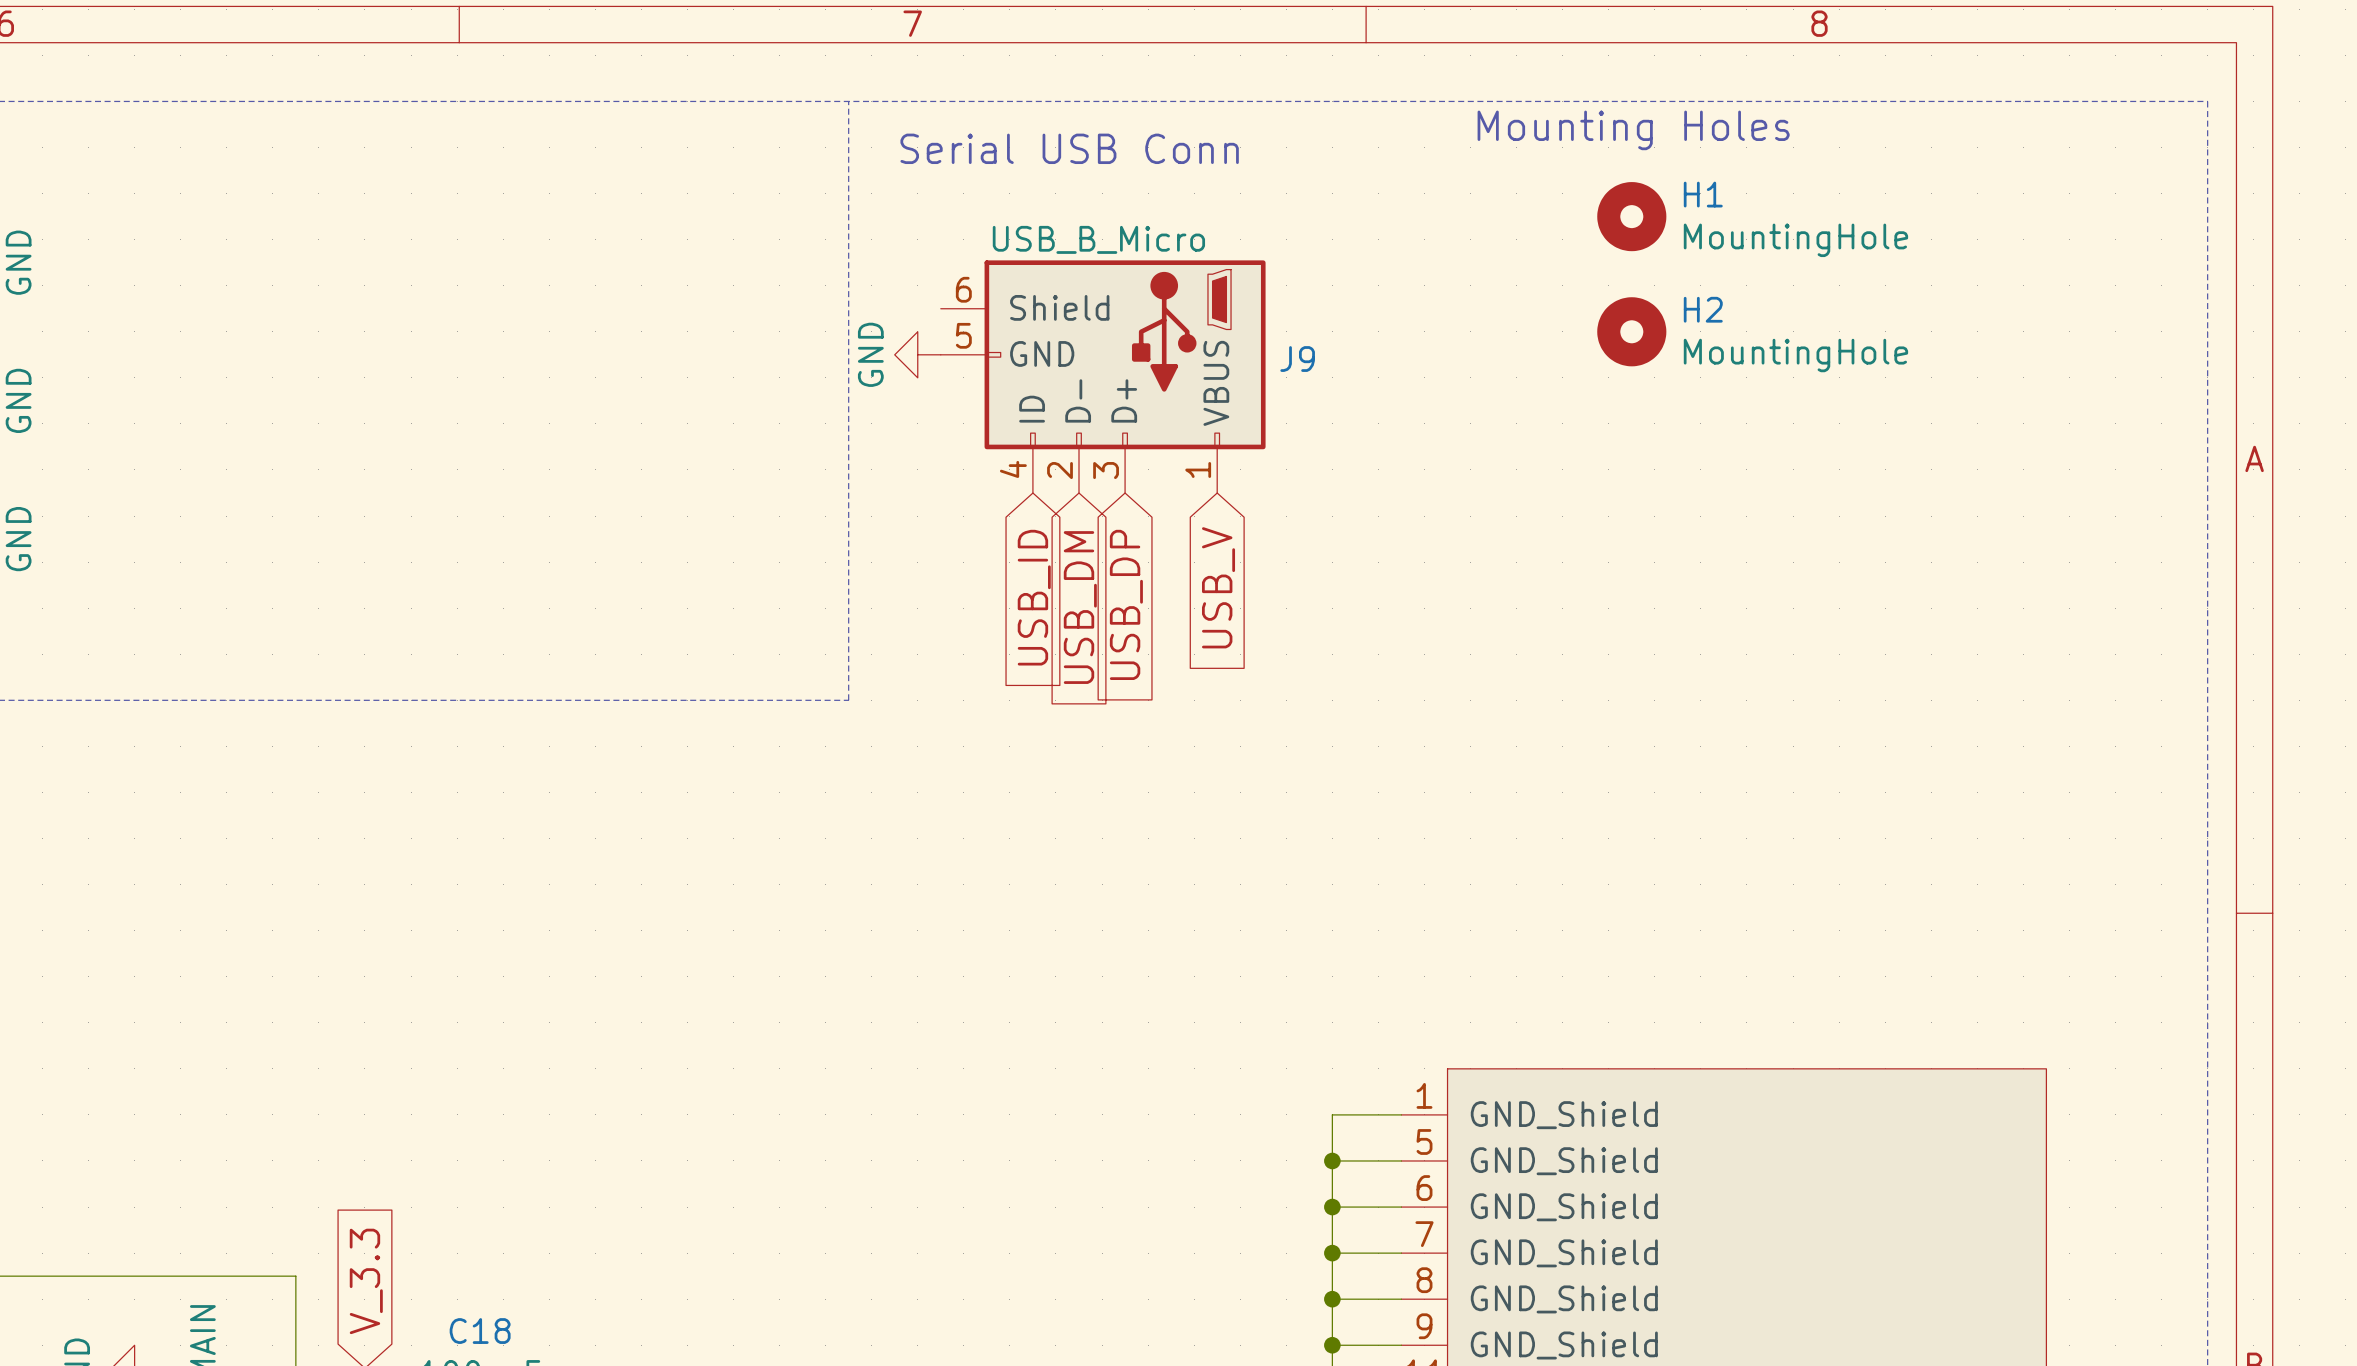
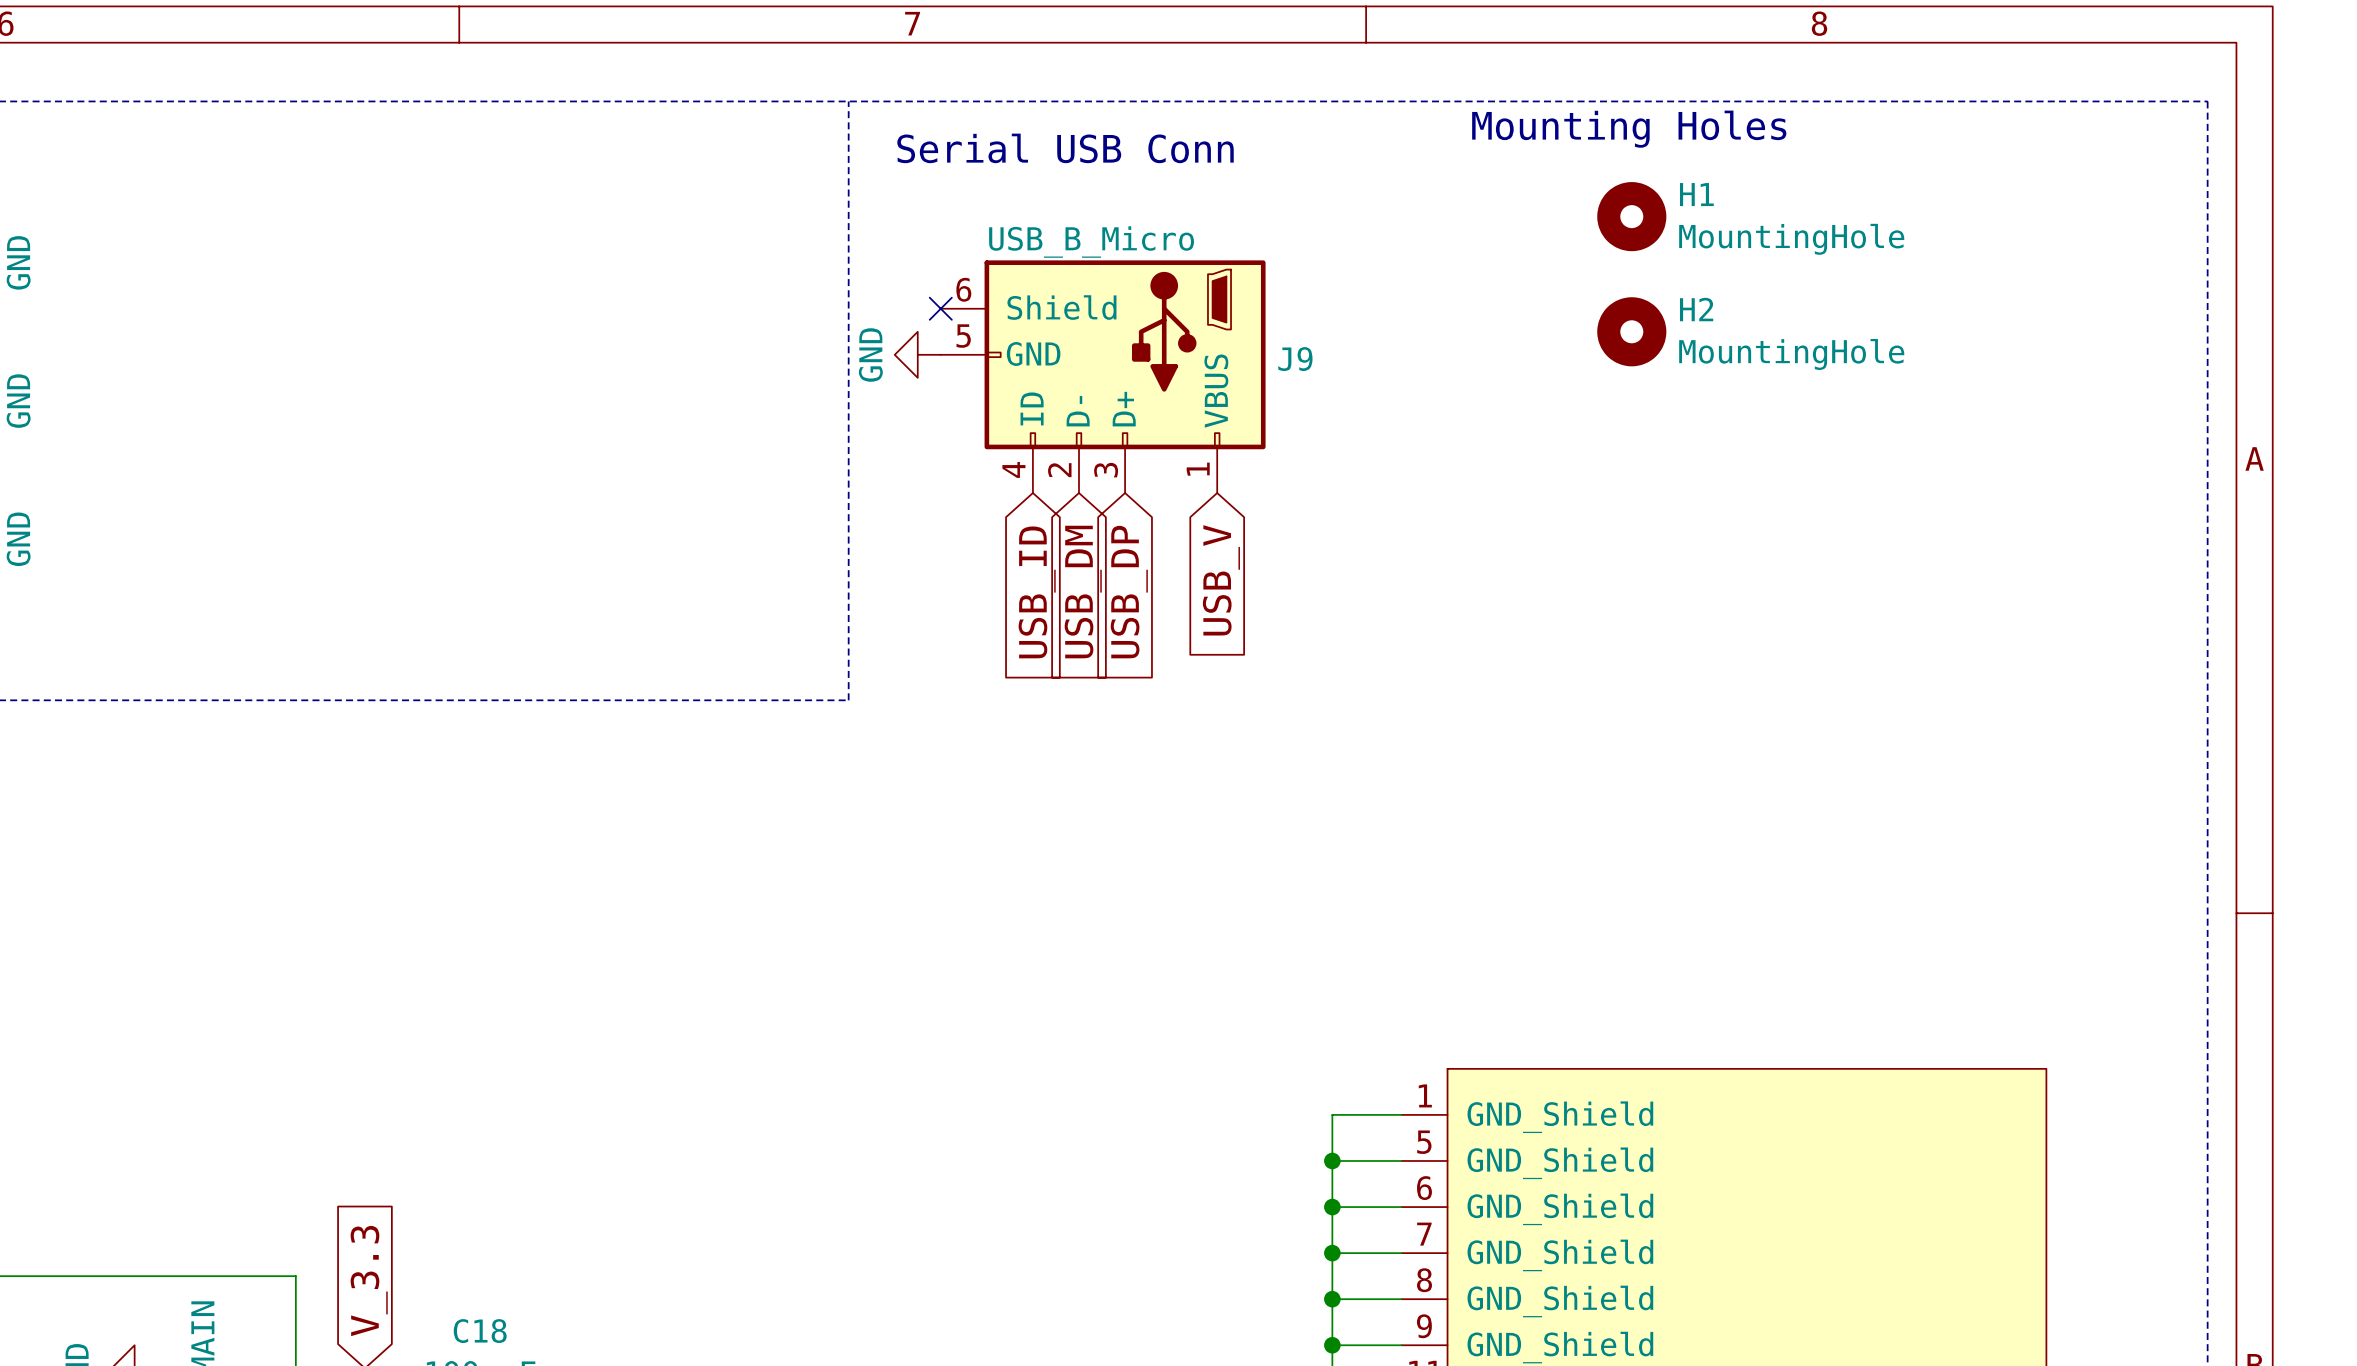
no-connect mark: none -> (940, 308)

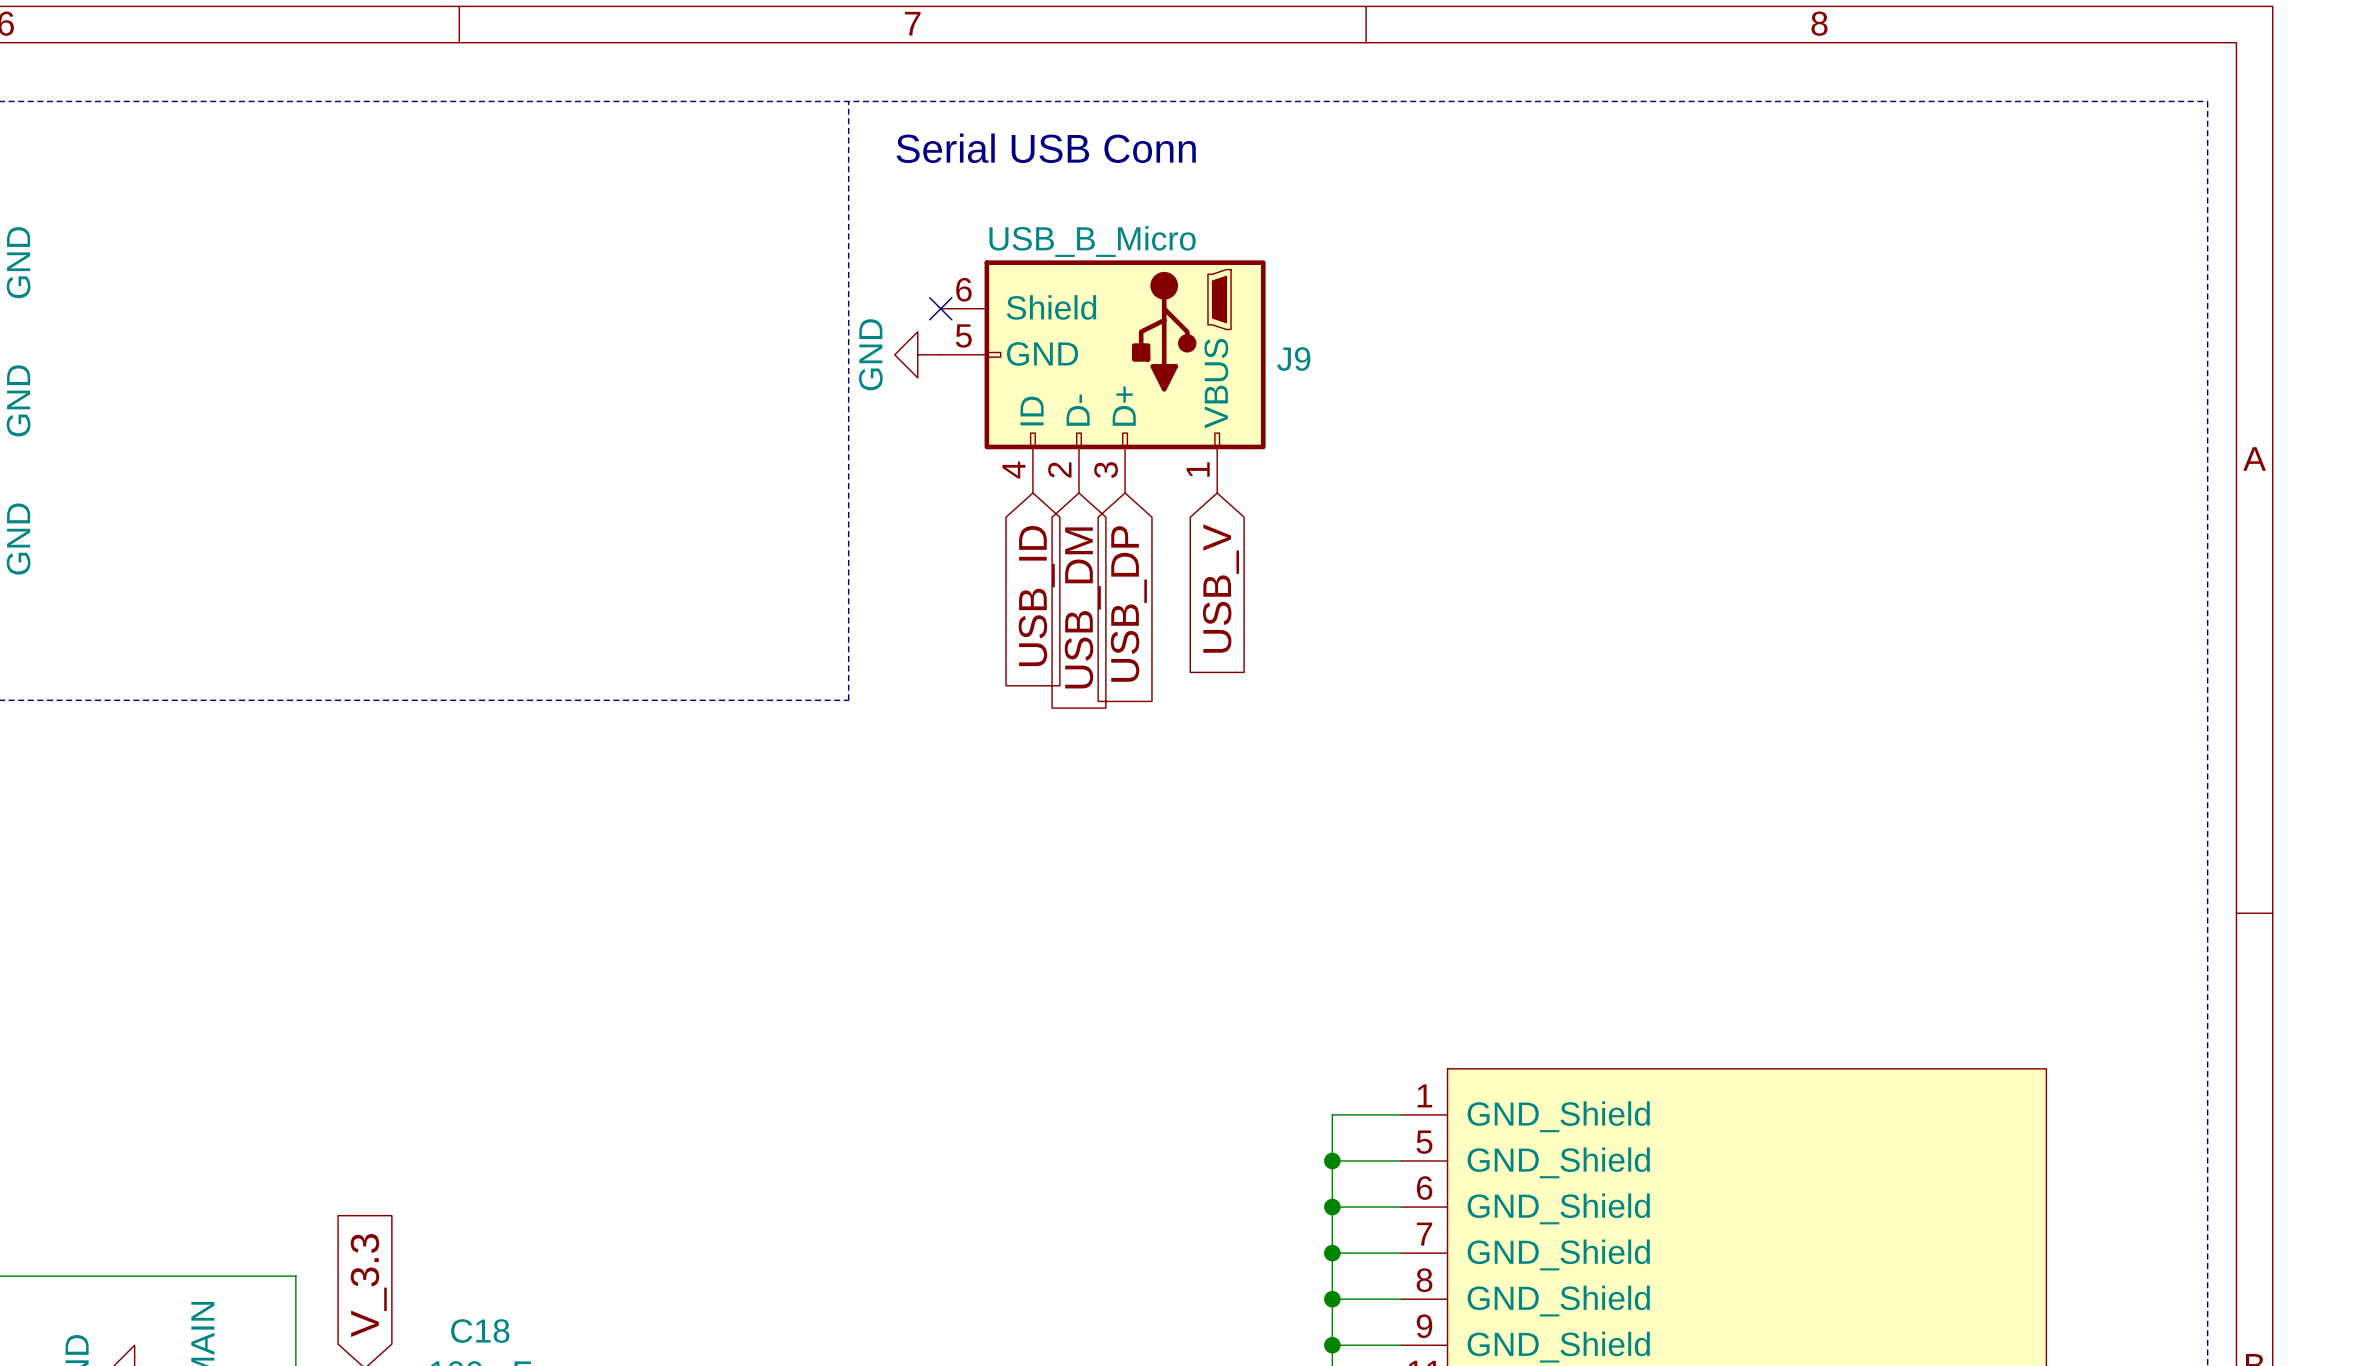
text: Mounting Holes (1629, 129) -> none
H1: MountingHole (1631, 216) -> none
H2: MountingHole (1631, 331) -> none

